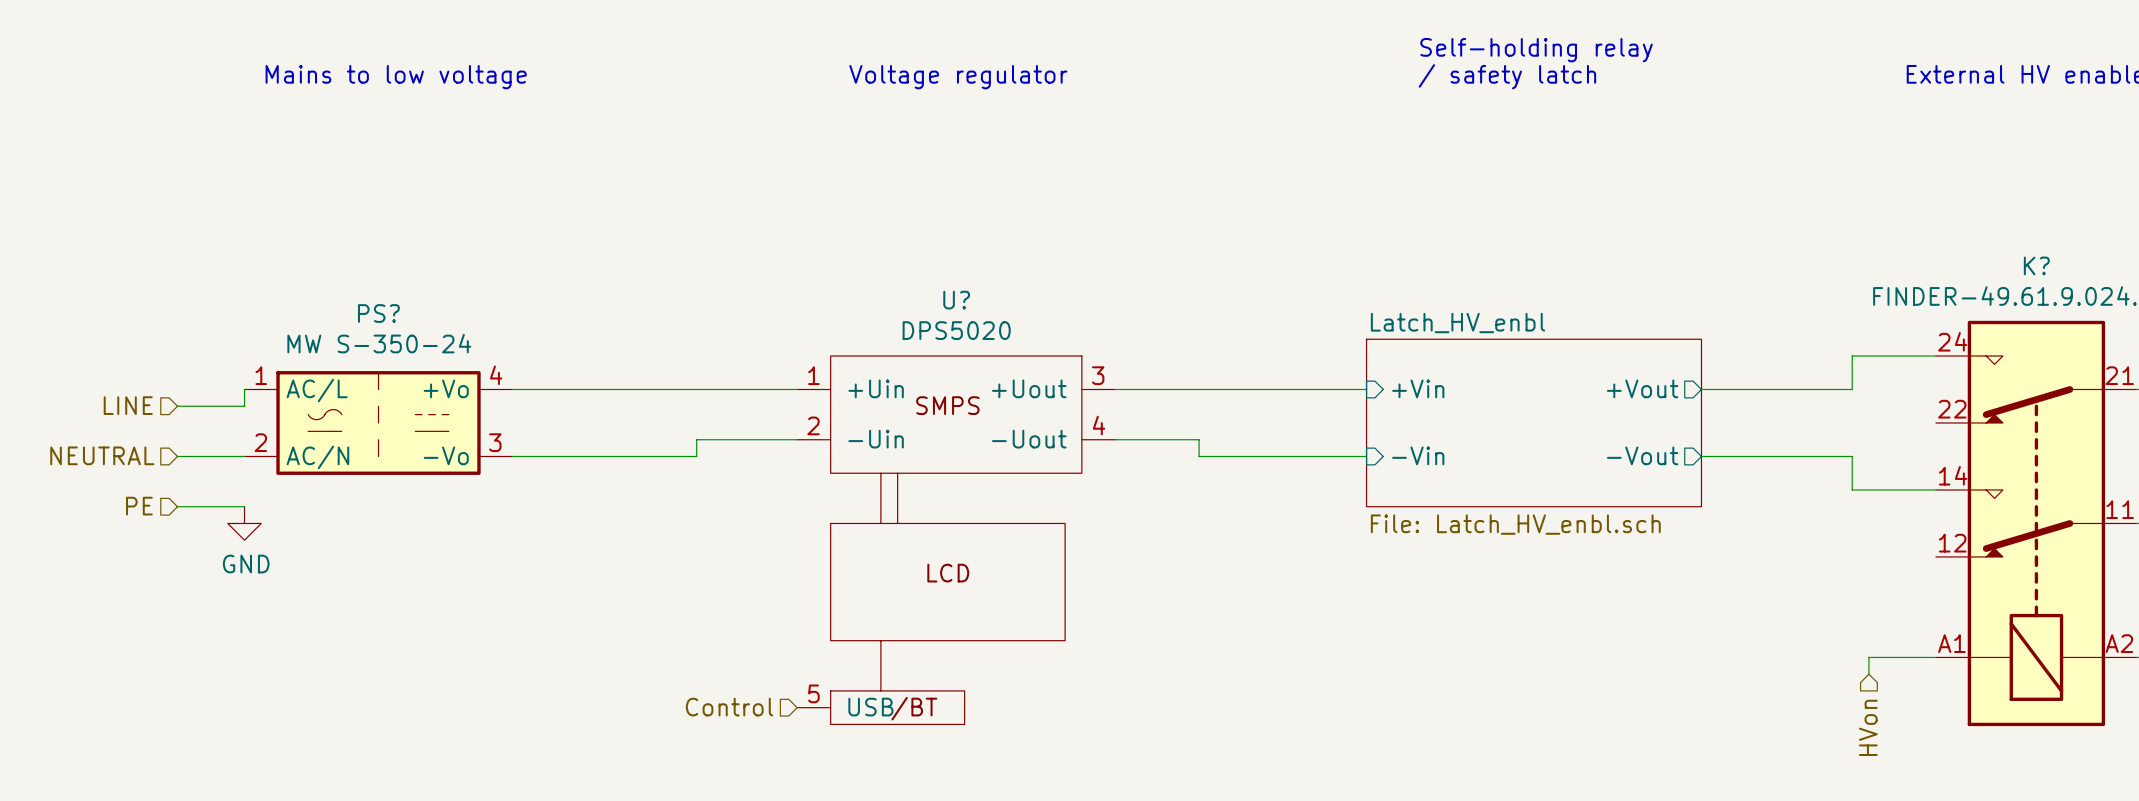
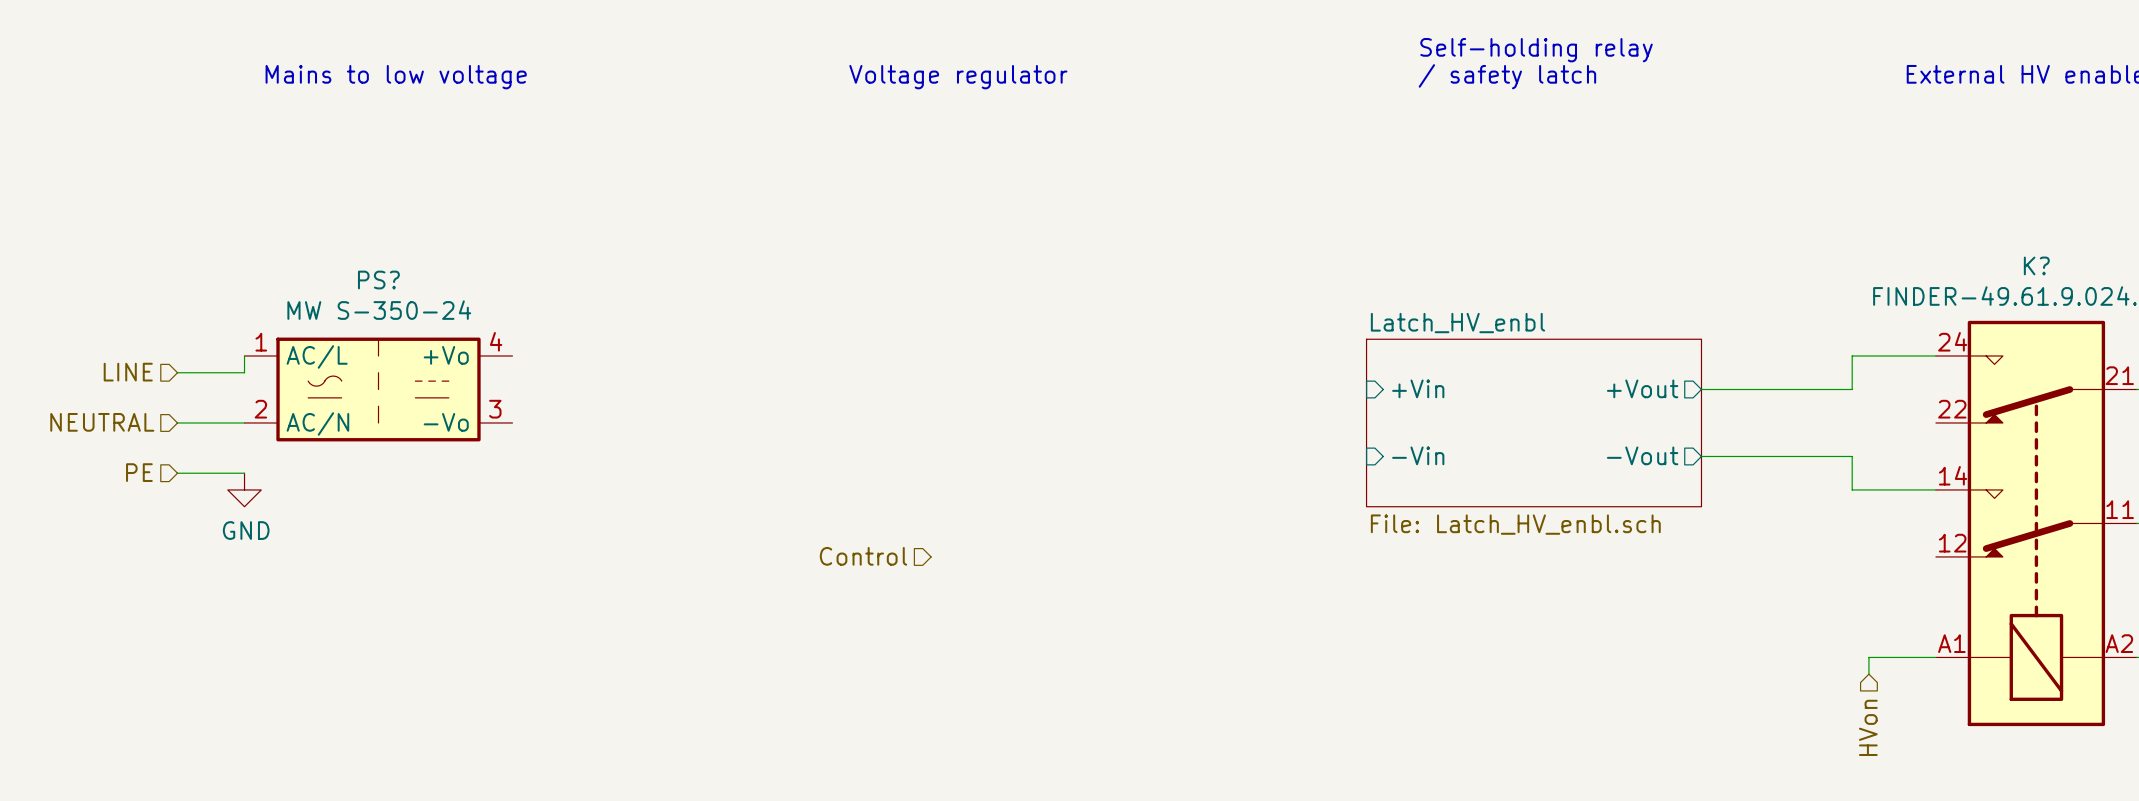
wire: (244, 389) (244, 406) (177, 406) -> (244, 356) (244, 372) (177, 372)
wire: (512, 389) (797, 389) -> none
wire: (1115, 389) (1366, 389) -> none
hierarchical label position: LINE (128, 405) -> LINE (128, 372)
PS? position: (378, 422) -> (378, 389)
wire: (797, 439) (696, 439) (696, 456) (512, 456) -> none
wire: (1115, 439) (1199, 439) (1199, 456) (1366, 456) -> none
hierarchical label position: NEUTRAL (102, 455) -> NEUTRAL (102, 422)
wire: (177, 456) (244, 456) -> (177, 422) (244, 422)
hierarchical label position: PE (139, 506) -> PE (139, 472)
wire: (177, 506) (244, 506) -> (177, 473) (244, 473)
power symbol position: GND (244, 523) -> GND (244, 489)
U?: DPS5020 (956, 540) -> none
hierarchical label position: Control (729, 707) -> Control (863, 556)

